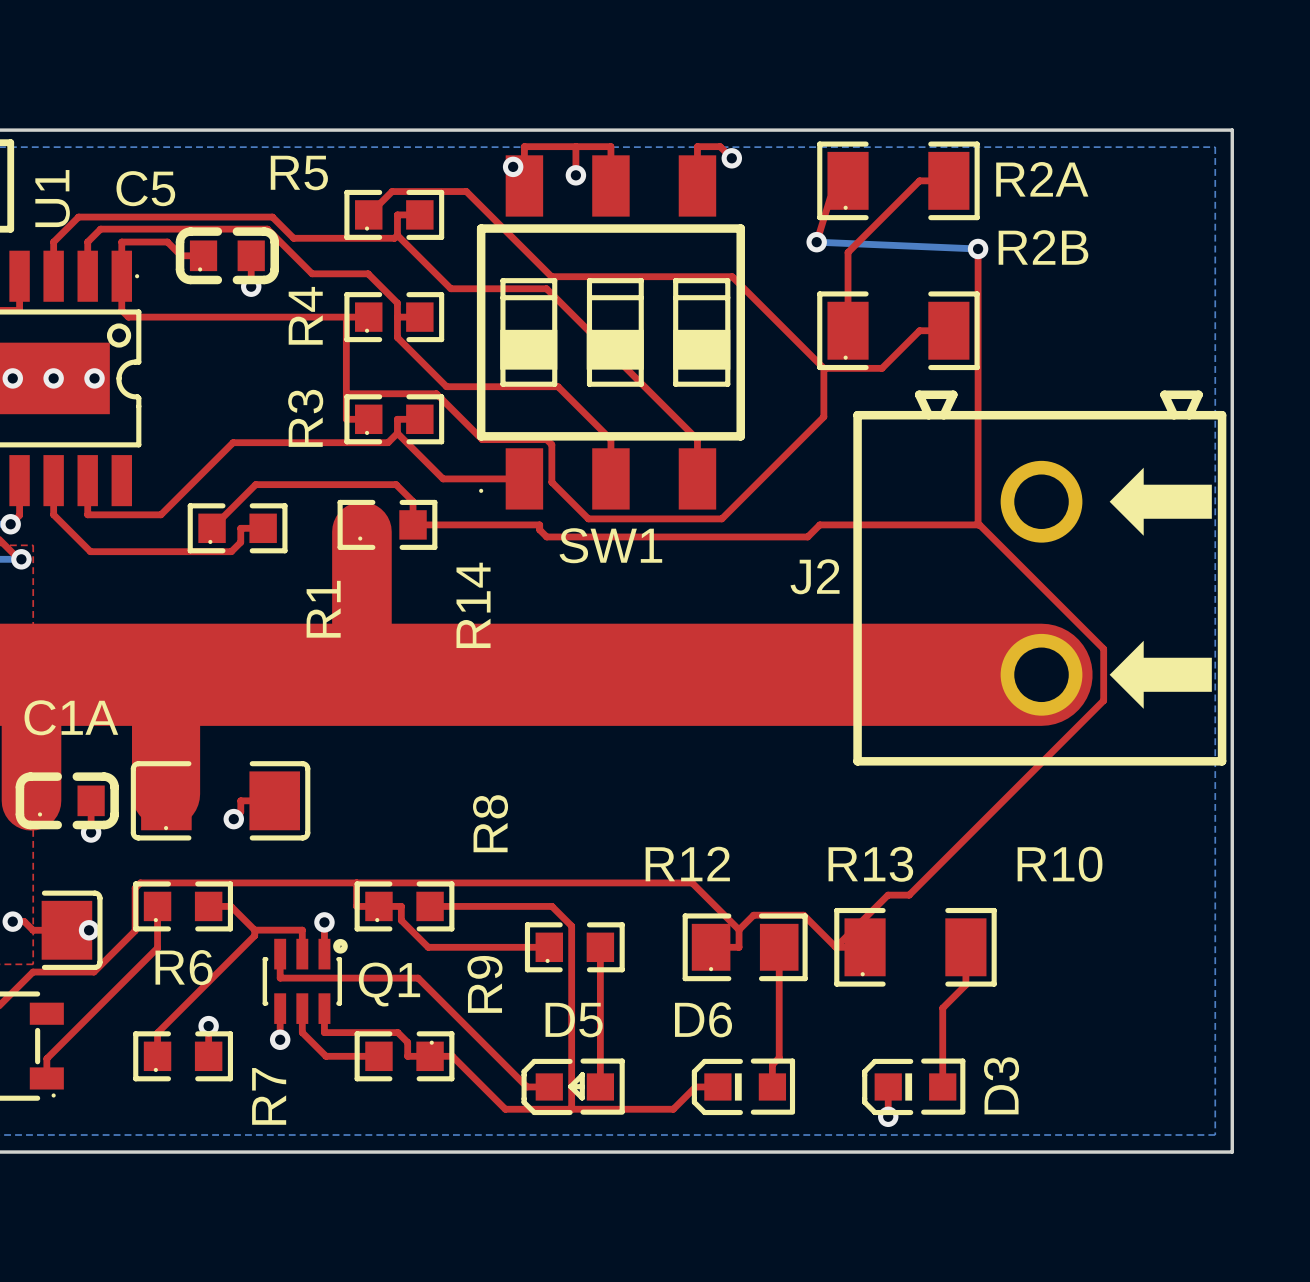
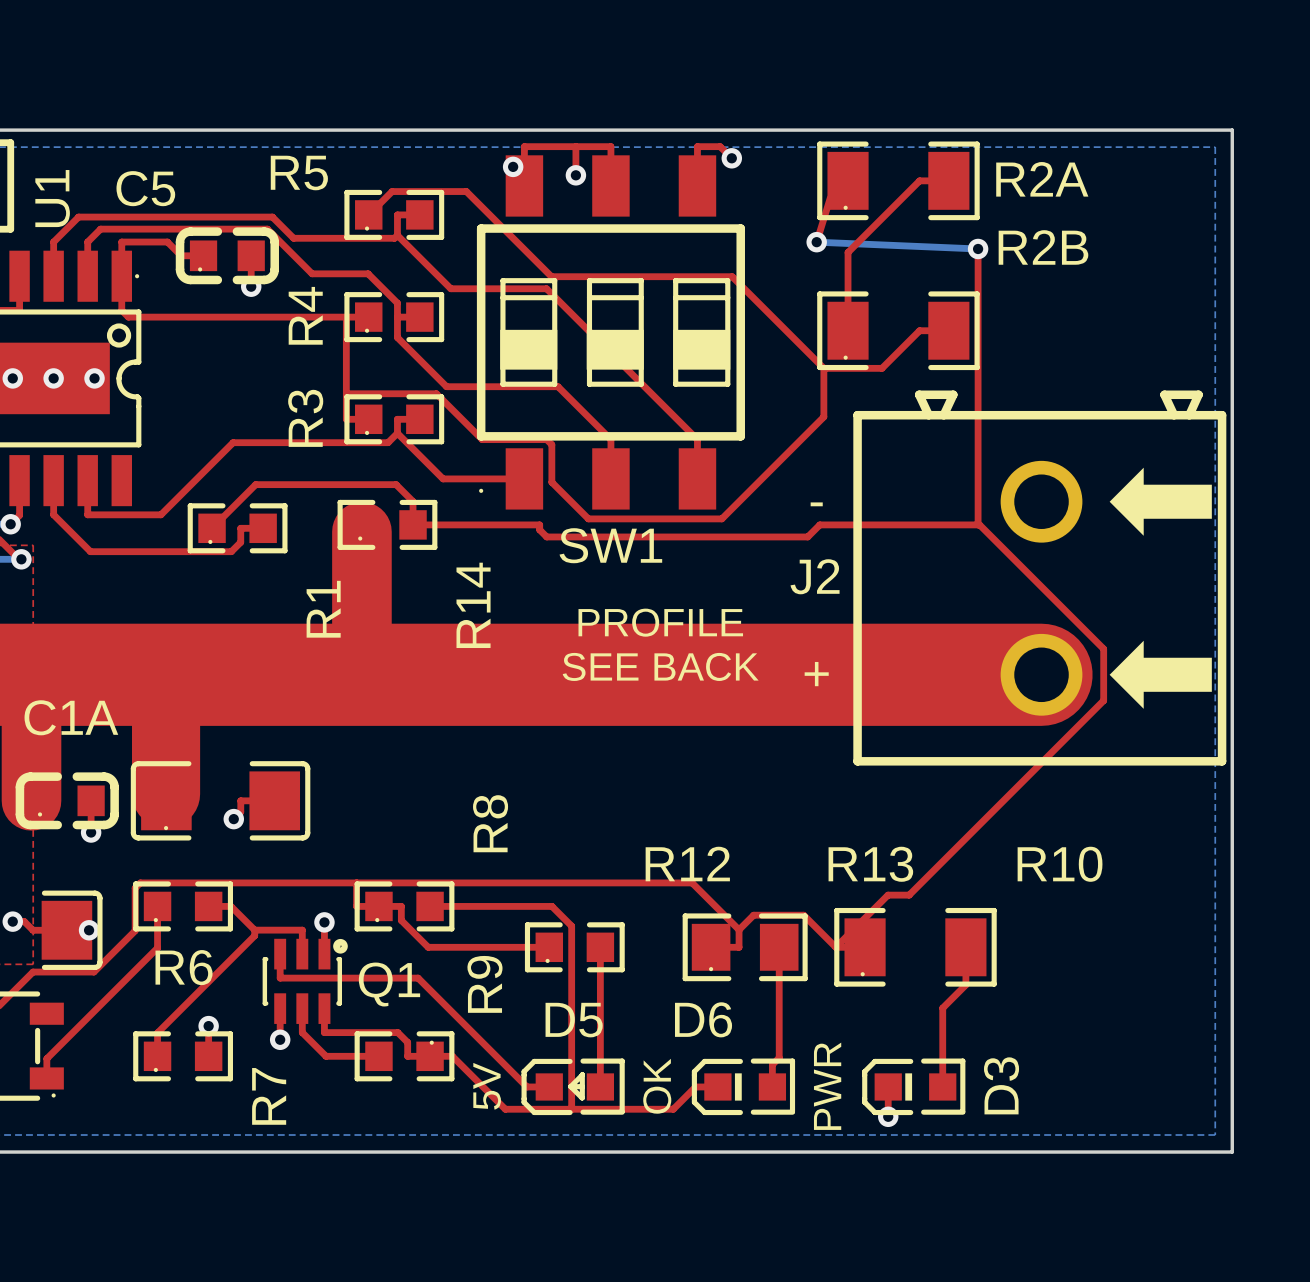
text: none -> - (816, 504)
text: none -> PROFILE (660, 622)
text: none -> SEE BACK (660, 666)
text: none -> + (816, 674)
text: none -> 5V (487, 1086)
text: none -> OK (657, 1086)
text: none -> PWR (827, 1086)

